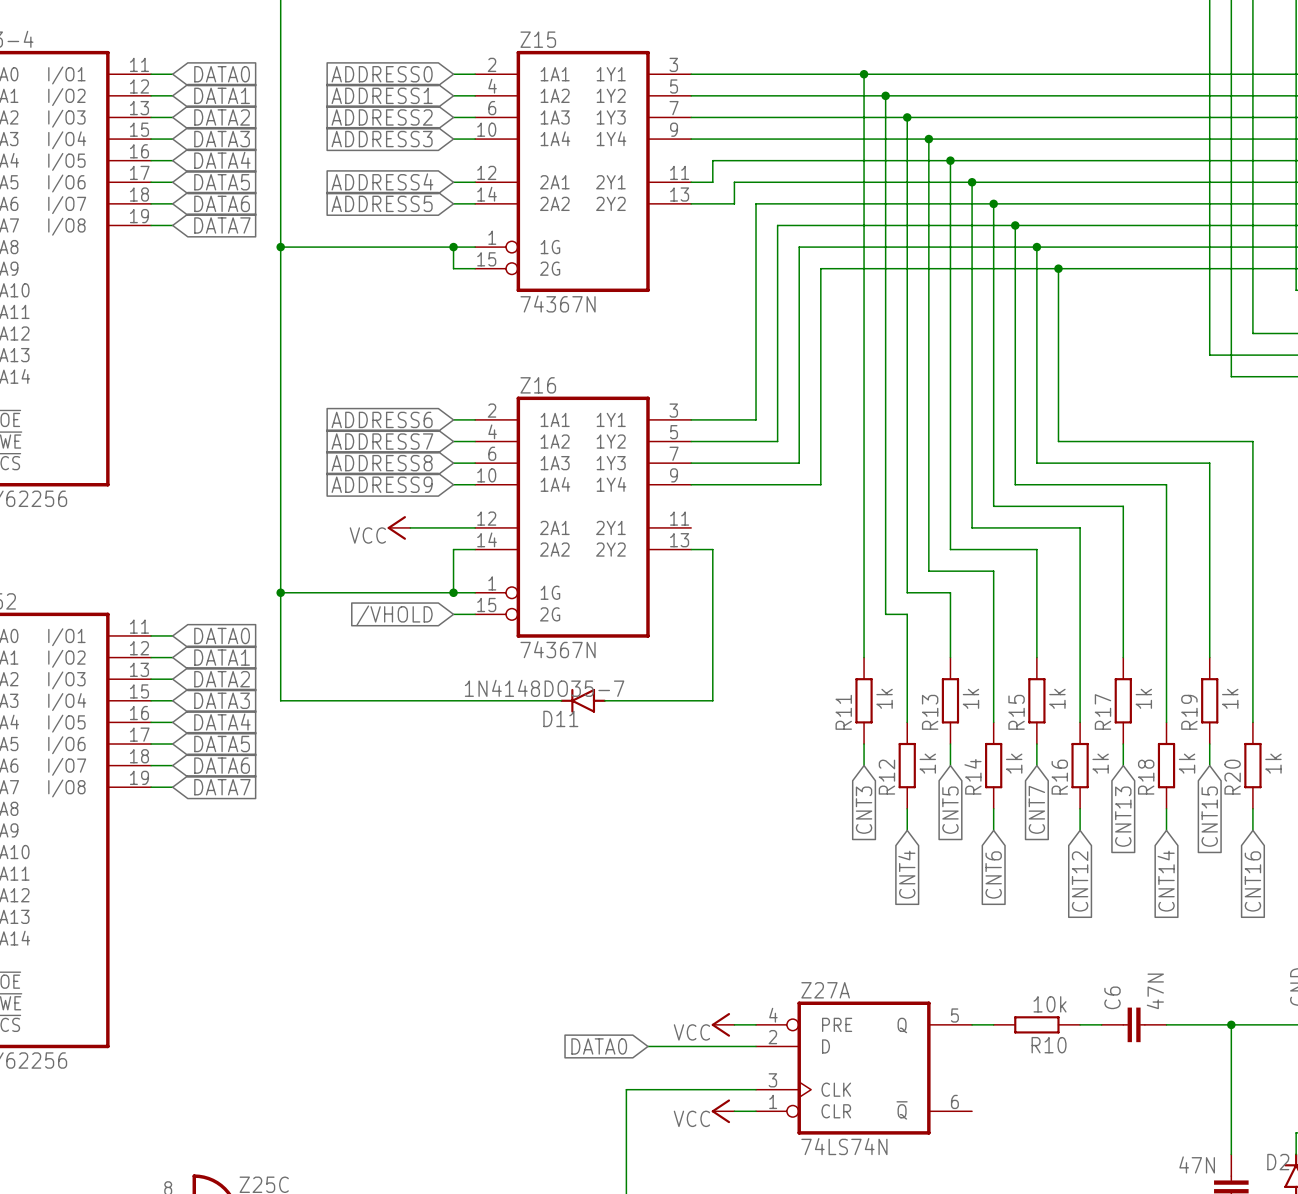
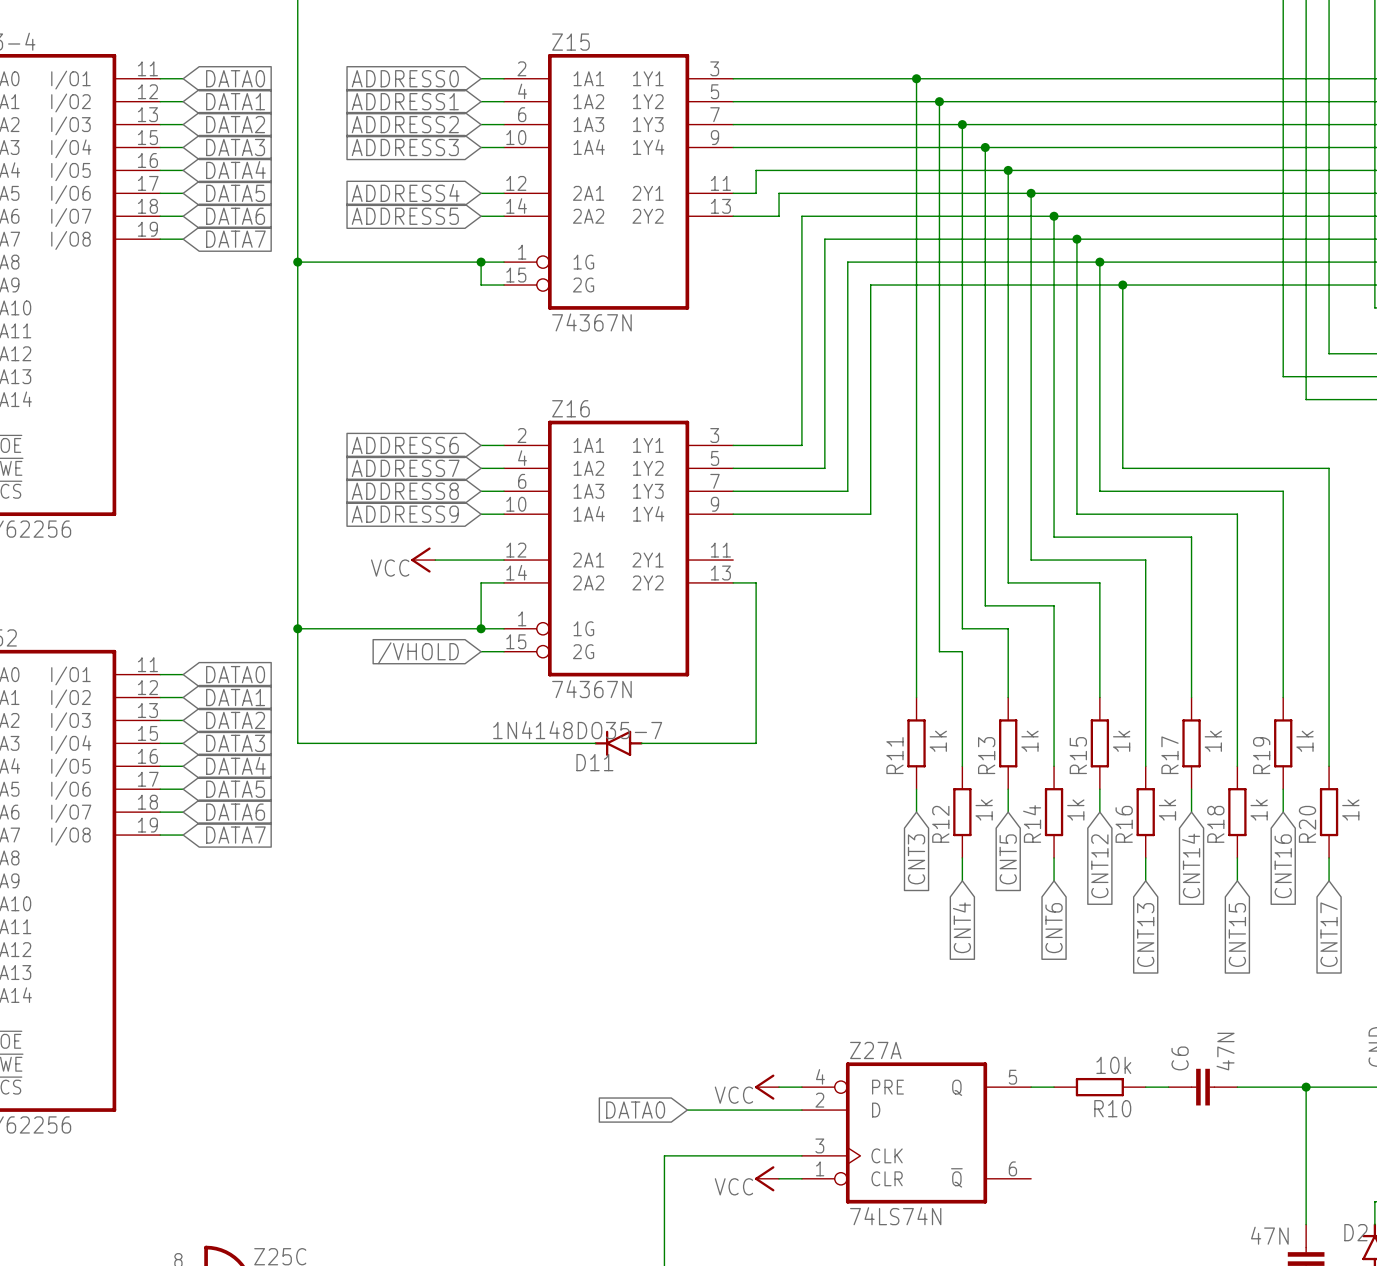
global label: CNT7 (1036, 809) -> CNT12 (1099, 866)
global label: CNT13 (1123, 816) -> CNT14 (1191, 865)
global label: CNT15 (1209, 816) -> CNT16 (1283, 866)
global label: CNT12 (1080, 881) -> CNT13 (1145, 935)
global label: CNT14 (1166, 881) -> CNT15 (1237, 935)
global label: CNT16 (1252, 881) -> CNT17 (1329, 934)

